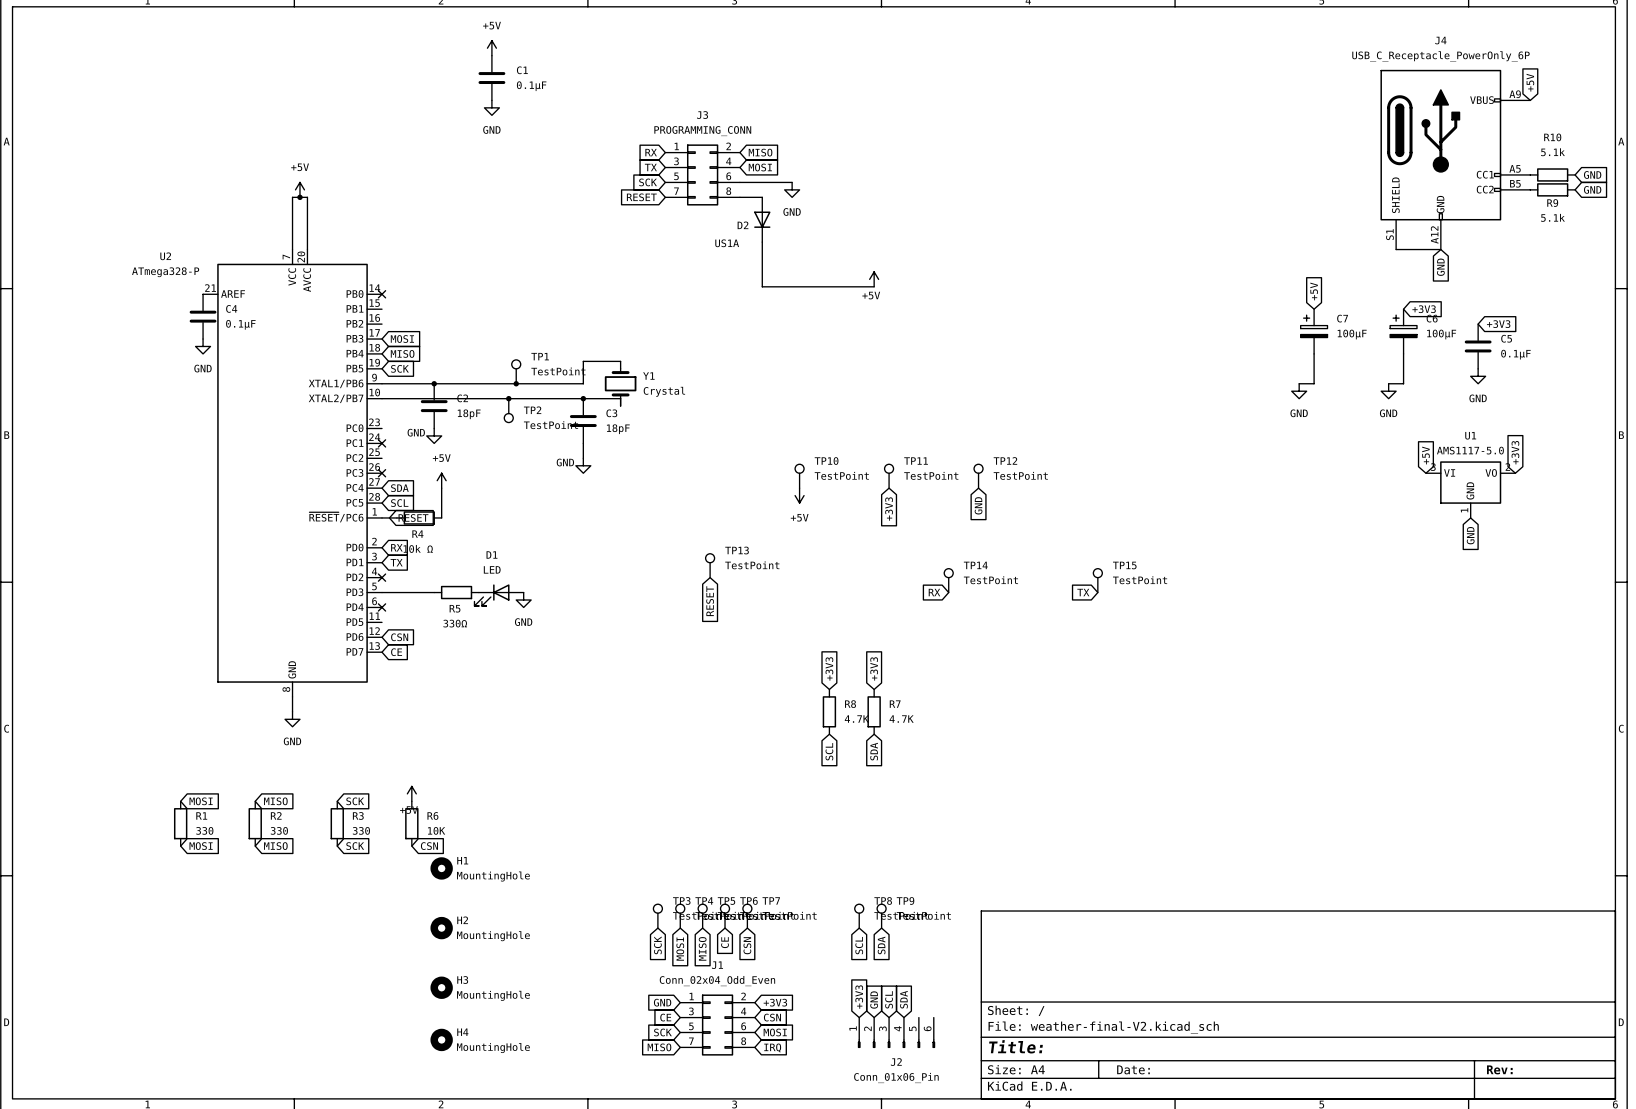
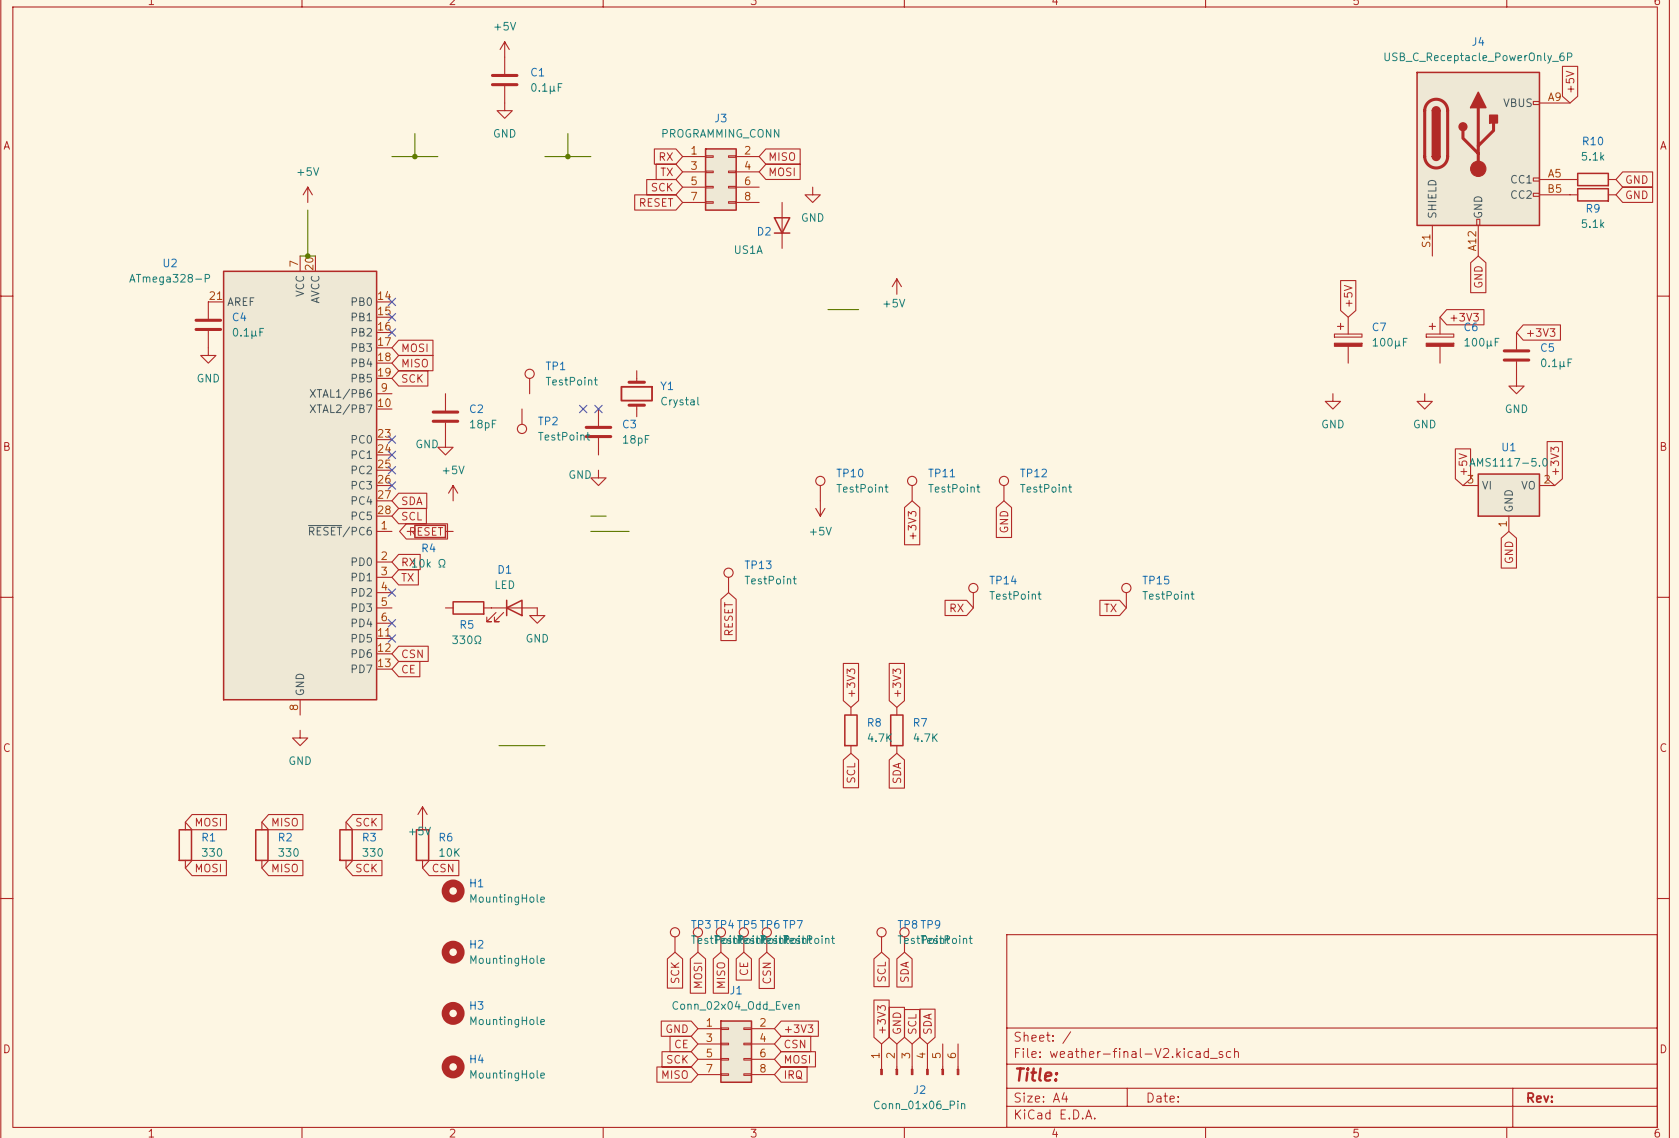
wire: none -> (414, 133) (414, 156)
wire: none -> (567, 133) (567, 156)
wire: none -> (391, 156) (437, 156)
junction: none -> (414, 156)
wire: none -> (544, 156) (590, 156)
junction: none -> (567, 156)
wire: (739, 182) (792, 182) -> none
junction: (299, 197) -> none
wire: (739, 197) (762, 197) -> none
wire: none -> (307, 210) (307, 256)
wire: (762, 242) (762, 286) (874, 286) -> none
wire: (292, 249) (292, 197) (307, 197) (307, 249) -> (300, 256) (315, 256)
junction: none -> (307, 256)
wire: (1396, 249) (1440, 249) -> none
wire: none -> (827, 309) (858, 309)
no-connect mark: none -> (391, 317)
no-connect mark: none -> (391, 332)
wire: (1314, 353) (1314, 383) (1299, 383) -> none
wire: (1403, 353) (1403, 383) (1388, 383) -> none
wire: (620, 361) (583, 361) (583, 383) (382, 383) -> none
junction: (434, 383) -> none
junction: (516, 383) -> none
wire: (382, 398) (620, 398) (620, 406) -> none
junction: (508, 398) -> none
no-connect mark: none -> (583, 409)
junction: (583, 398) -> none
no-connect mark: none -> (598, 409)
no-connect mark: none -> (391, 439)
wire: (583, 443) (583, 458) -> none
no-connect mark: none -> (391, 470)
wire: (441, 488) (441, 517) -> none
wire: none -> (590, 516) (606, 516)
wire: (382, 517) (396, 517) -> none
wire: none -> (590, 531) (629, 531)
wire: (382, 592) (434, 592) -> none
no-connect mark: none -> (391, 638)
wire: (292, 696) (292, 711) -> none
wire: none -> (499, 745) (544, 745)

